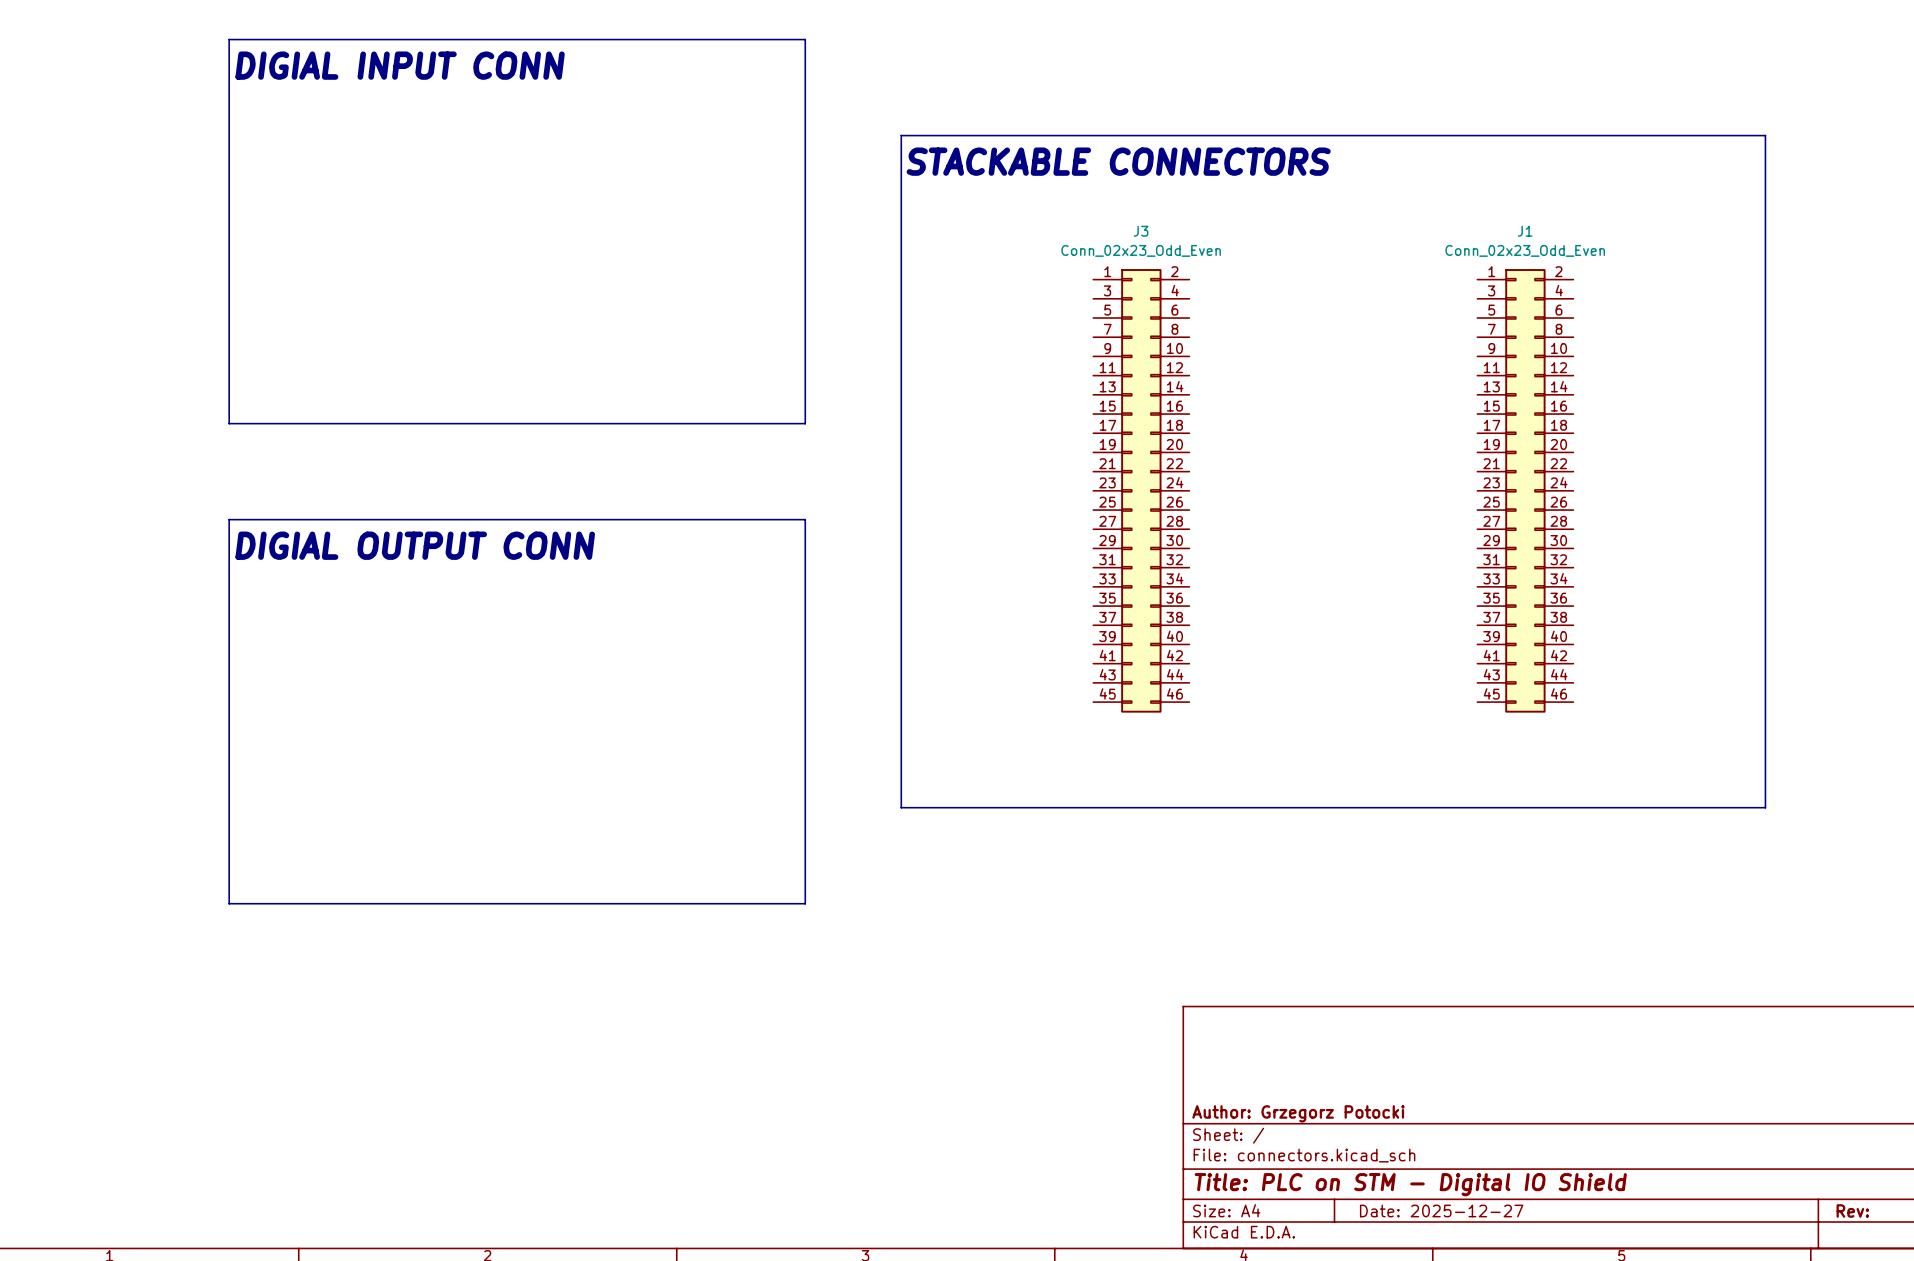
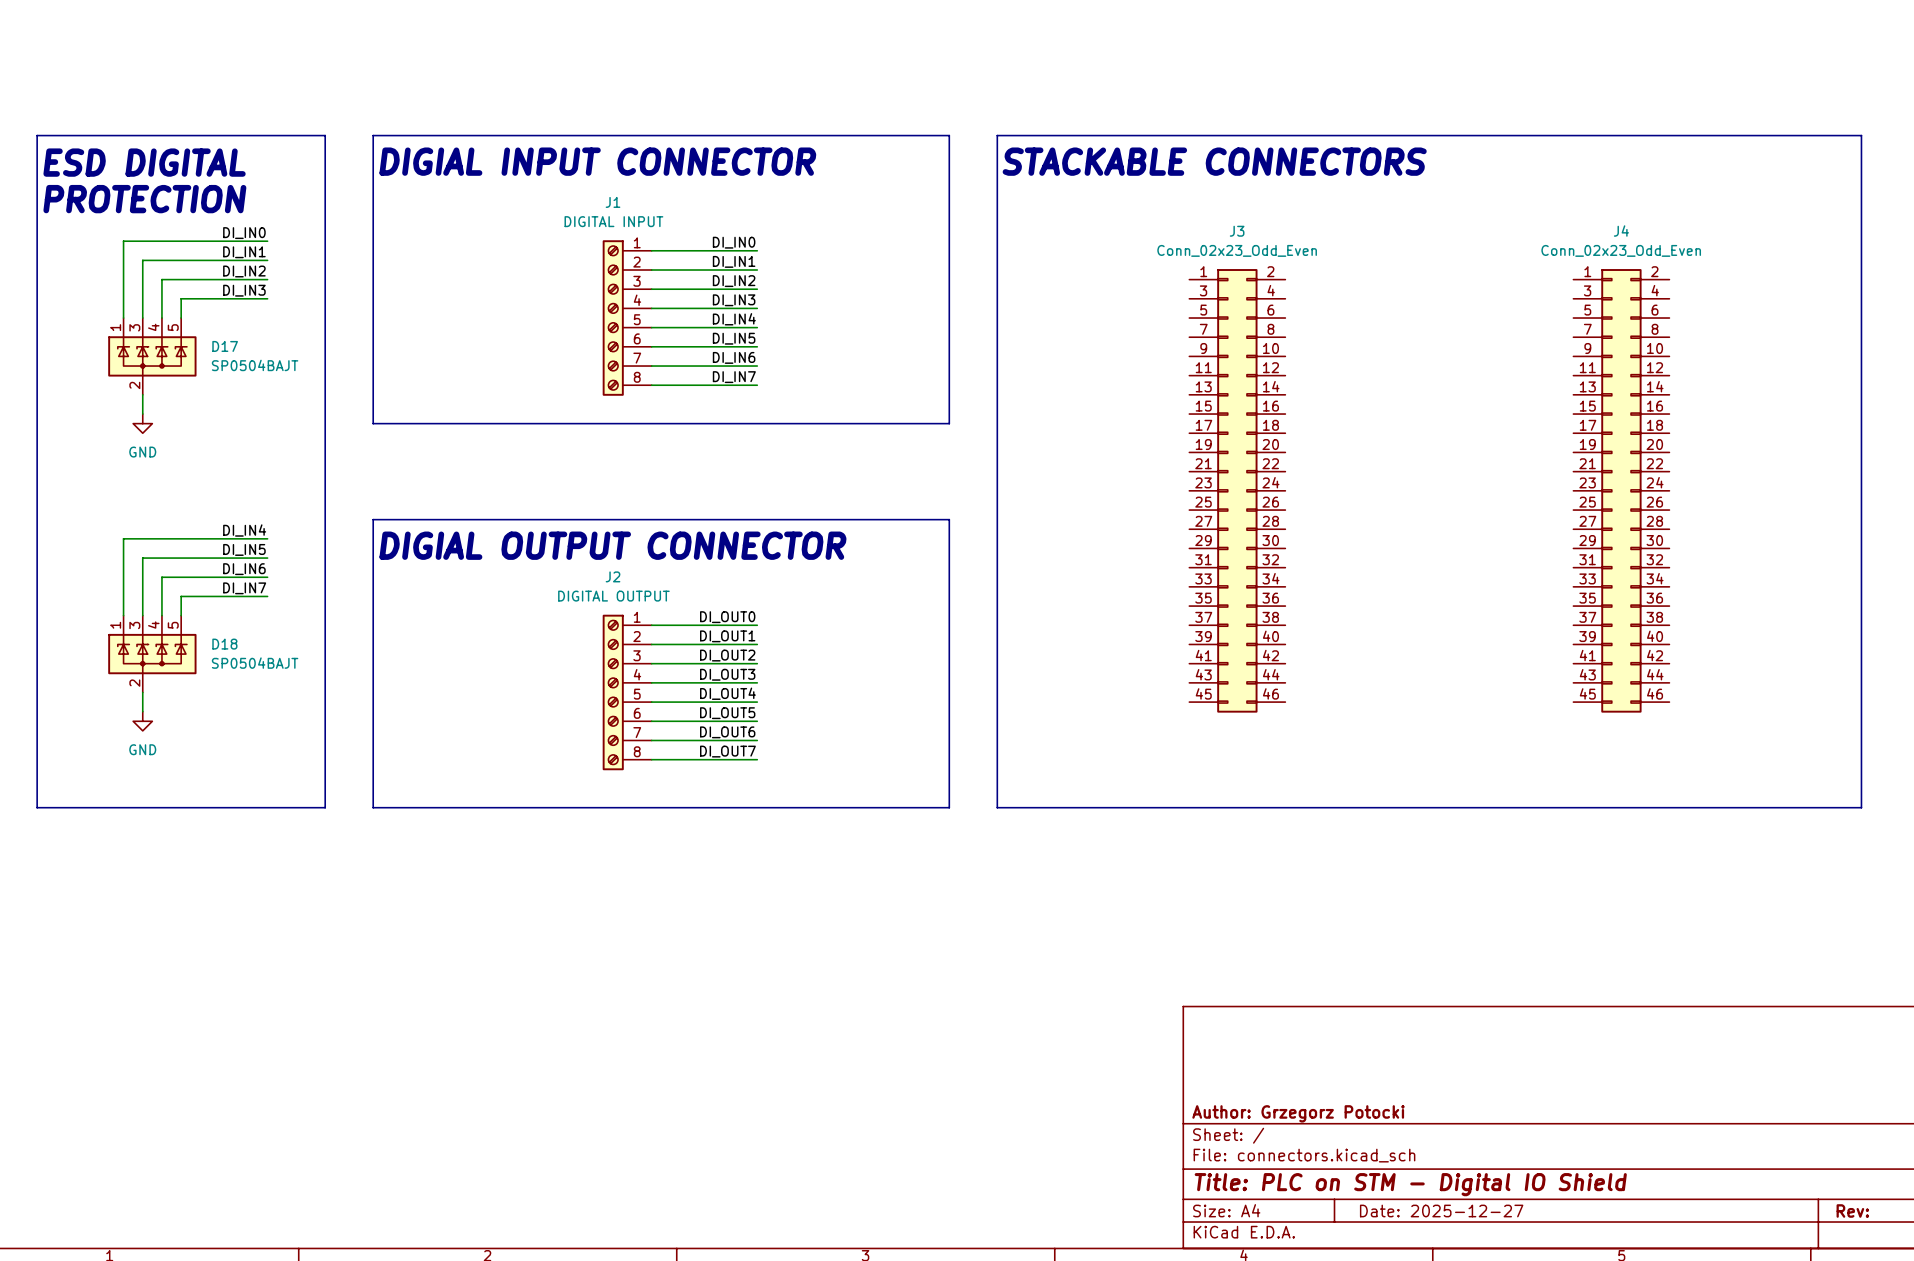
text: DIGIAL INPUT CONN (400, 65) -> none
line: none -> (37, 135) (325, 135) (325, 807) (37, 807) (37, 135)
line: (901, 135) (901, 807) -> (997, 135) (997, 807)
line: (949, 135) (997, 135) -> (949, 135) (949, 423) (805, 423)
line: (1765, 135) (1765, 807) -> (1765, 135) (1861, 135) (1861, 807) (1765, 807)
text: none -> DIGIAL INPUT CONNECTOR (597, 161)
text position: STACKABLE CONNECTORS (1118, 161) -> STACKABLE CONNECTORS (1214, 161)
text: none -> ESD DIGITAL (144, 162)
text: none -> PROTECTION (144, 199)
J1 name position: J1 (1525, 231) -> J1 (613, 202)
label: none -> DI_IN0 (244, 233)
wire: none -> (267, 241) (123, 241) (123, 318)
label: none -> DI_IN0 (734, 242)
wire: none -> (651, 250) (757, 250)
J1 value: Conn_02x23_Odd_Even (1525, 250) -> DIGITAL INPUT (613, 221)
label: none -> DI_IN1 (244, 252)
wire: none -> (267, 260) (142, 260) (142, 318)
label: none -> DI_IN1 (734, 261)
J1 symbol: [1477, 269, 1574, 713] -> [602, 240, 652, 396]
wire: none -> (651, 270) (757, 270)
label: none -> DI_IN2 (244, 271)
wire: none -> (267, 279) (161, 279) (161, 318)
label: none -> DI_IN2 (734, 281)
wire: none -> (651, 289) (757, 289)
label: none -> DI_IN3 (244, 290)
wire: none -> (267, 298) (181, 298) (181, 318)
label: none -> DI_IN3 (734, 300)
wire: none -> (651, 308) (757, 308)
label: none -> DI_IN4 (734, 319)
wire: none -> (651, 327) (757, 327)
label: none -> DI_IN5 (734, 338)
wire: none -> (651, 346) (757, 346)
D17: none -> SP0504BAJT (152, 356)
label: none -> DI_IN6 (734, 357)
wire: none -> (651, 366) (757, 366)
label: none -> DI_IN7 (734, 377)
wire: none -> (651, 385) (757, 385)
wire: none -> (142, 394) (142, 414)
power symbol: none -> GND (142, 423)
line: (373, 423) (229, 423) (229, 39) (805, 39) (805, 423) -> (373, 423) (373, 135) (901, 135)
J3 position: (1141, 490) -> (1237, 490)
J4: none -> Conn_02x23_Odd_Even (1621, 490)
line: (373, 519) (229, 519) (229, 903) (805, 903) (805, 519) -> (373, 519) (373, 807) (901, 807)
label: none -> DI_IN4 (244, 530)
wire: none -> (267, 538) (123, 538) (123, 615)
text: DIGIAL OUTPUT CONN (415, 545) -> DIGIAL OUTPUT CONNECTOR (612, 545)
label: none -> DI_IN5 (244, 549)
wire: none -> (267, 558) (142, 558) (142, 615)
label: none -> DI_IN6 (244, 569)
wire: none -> (267, 577) (161, 577) (161, 615)
label: none -> DI_IN7 (244, 588)
wire: none -> (267, 596) (181, 596) (181, 615)
label: none -> DI_OUT0 (727, 617)
wire: none -> (651, 625) (757, 625)
label: none -> DI_OUT1 (727, 636)
wire: none -> (651, 644) (757, 644)
D18: none -> SP0504BAJT (152, 654)
label: none -> DI_OUT2 (727, 655)
wire: none -> (651, 663) (757, 663)
label: none -> DI_OUT3 (727, 674)
wire: none -> (651, 682) (757, 682)
wire: none -> (142, 692) (142, 711)
J2: none -> DIGITAL OUTPUT (627, 692)
label: none -> DI_OUT4 (727, 693)
wire: none -> (651, 702) (757, 702)
label: none -> DI_OUT5 (727, 713)
power symbol: none -> GND (142, 721)
wire: none -> (651, 721) (757, 721)
label: none -> DI_OUT6 (727, 732)
wire: none -> (651, 740) (757, 740)
label: none -> DI_OUT7 (727, 751)
wire: none -> (651, 759) (757, 759)
line: (949, 807) (997, 807) -> (949, 807) (949, 519) (805, 519)

